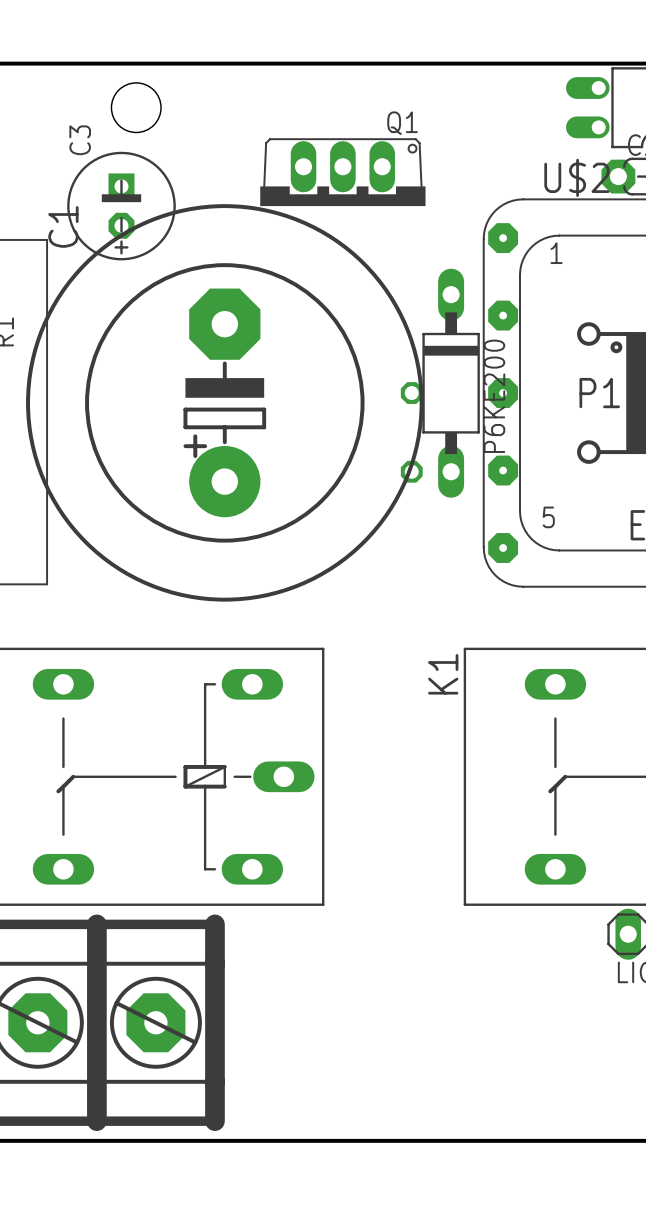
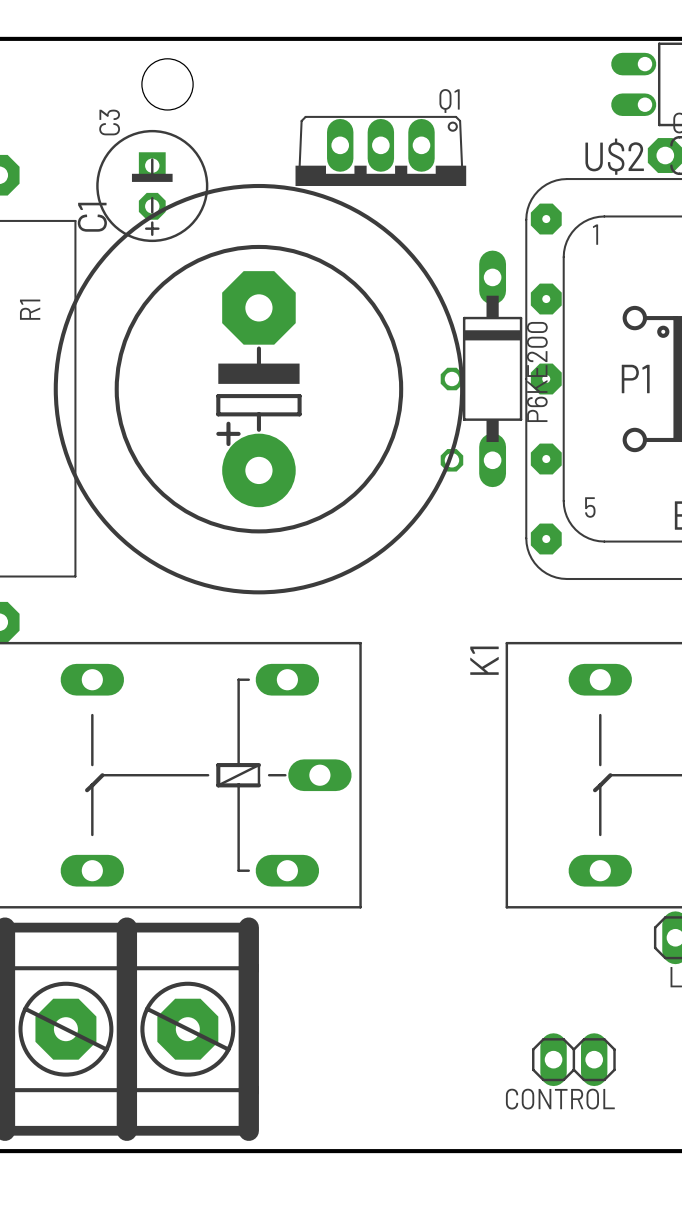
CONTROL: none -> (573, 1059)

